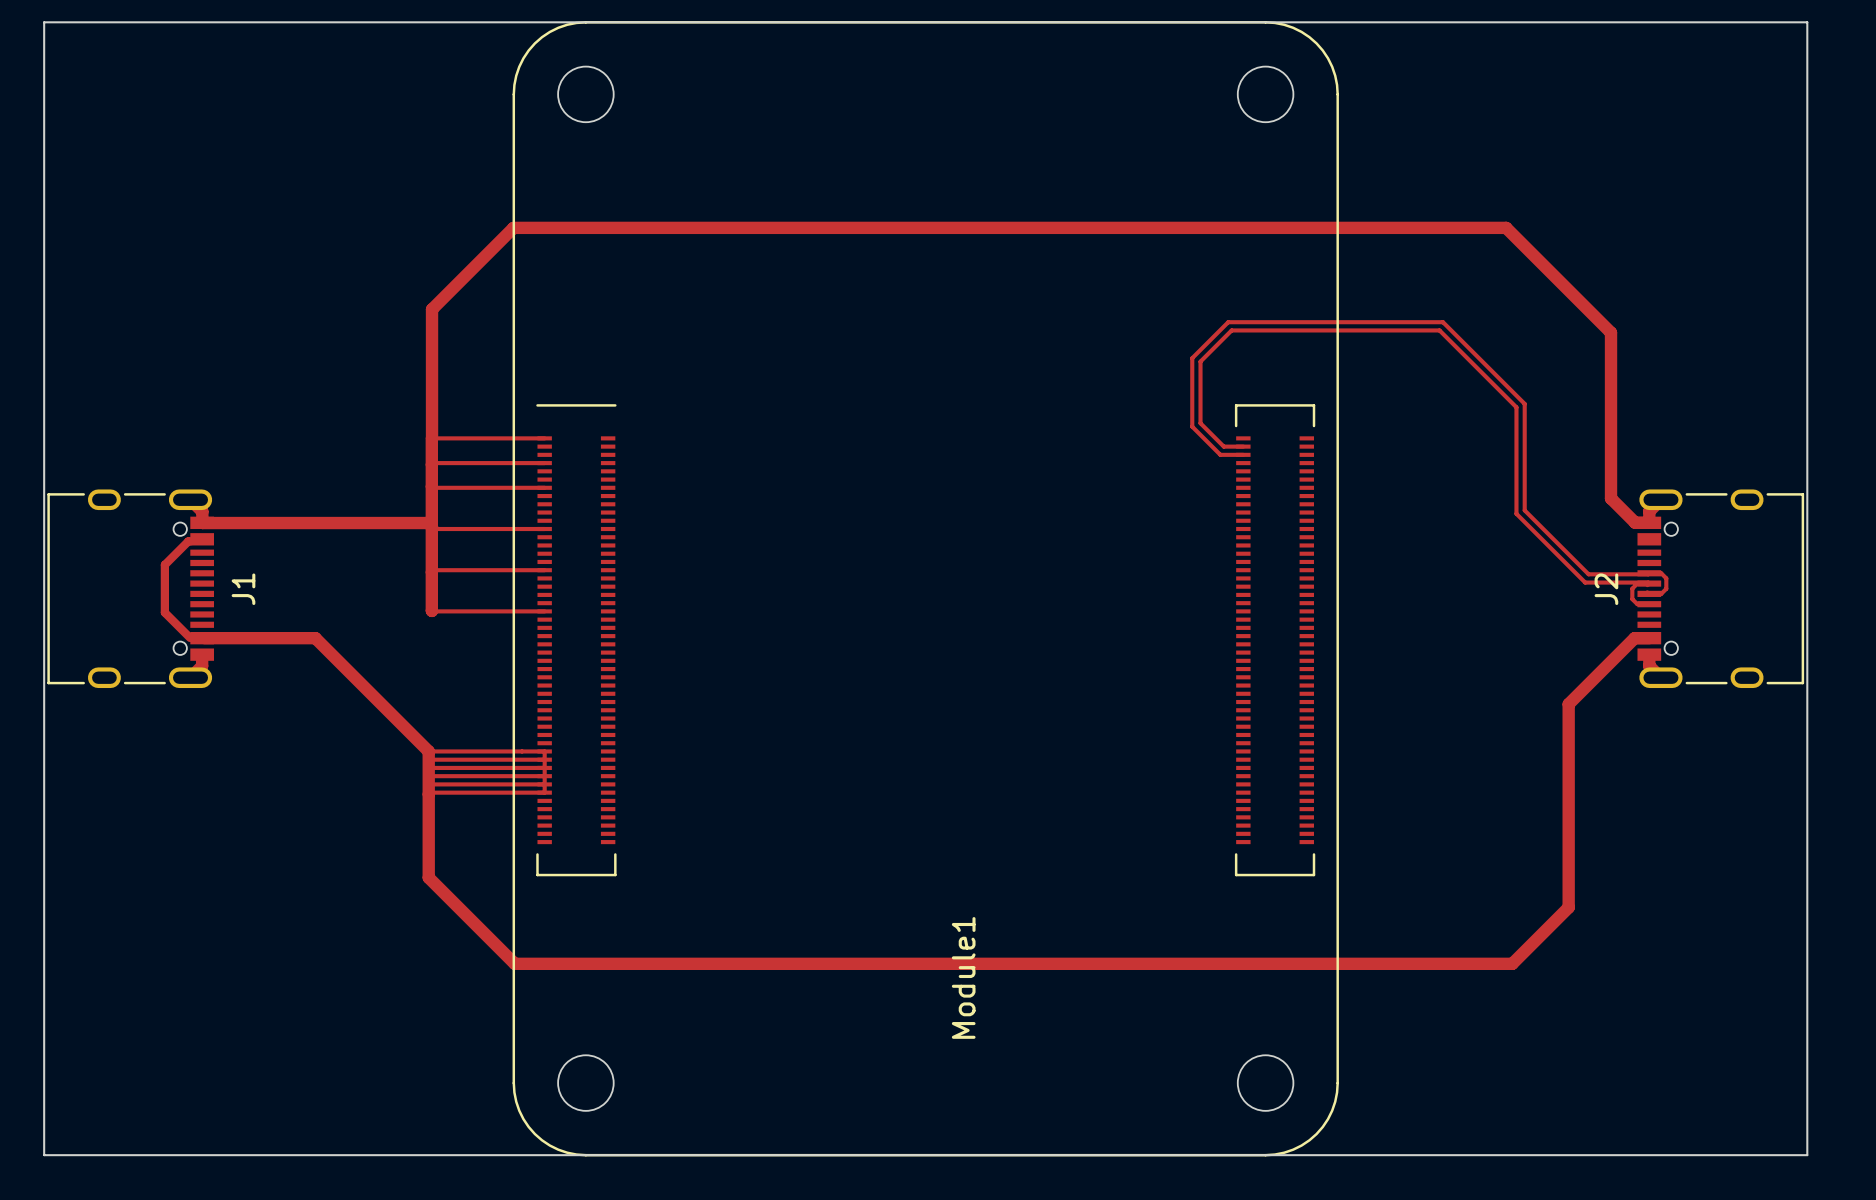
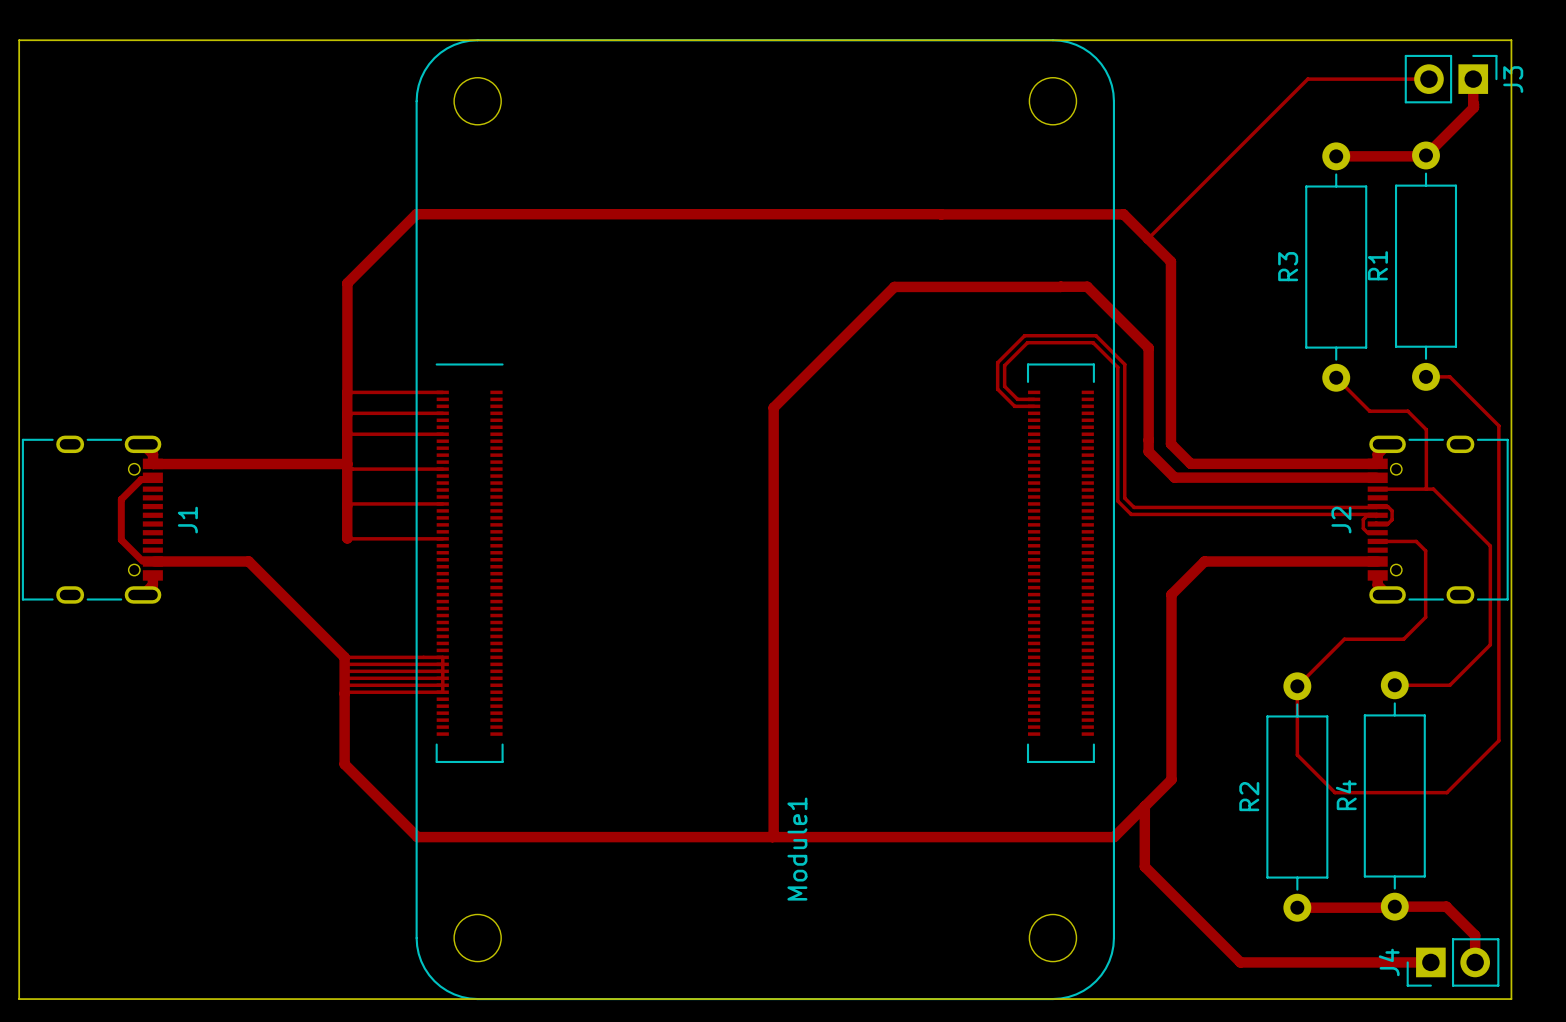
top track: none -> (1428, 79) (1307, 79) (1148, 238)
J3: none -> (1451, 79)
top track: none -> (1473, 79) (1473, 107) (1425, 156) (1336, 156)
top track: (1133, 227) (1506, 227) (1611, 332) (1611, 498) (1635, 522) -> (941, 214) (1123, 214) (1170, 261) (1170, 443) (1190, 463) (1365, 463)
R1: none -> (1426, 266)
R3: none -> (1336, 267)
top track: none -> (1060, 286) (894, 286) (773, 407) (772, 837)
top track: none -> (1060, 286) (1087, 286) (1148, 348) (1148, 451) (1174, 477) (1376, 477)
top track: none -> (1426, 376) (1449, 376) (1498, 425) (1498, 740) (1446, 792) (1335, 792) (1297, 754) (1297, 686) (1344, 639) (1403, 639) (1425, 617) (1425, 550) (1416, 541) (1377, 541)
top track: none -> (1336, 377) (1369, 411) (1407, 411) (1426, 429) (1426, 489)
top track: (1208, 431) (1200, 423) (1200, 361) (1231, 330) (1439, 330) (1516, 407) (1516, 513) (1585, 582) -> (1004, 386) (1004, 365) (1027, 342) (1093, 342) (1117, 367) (1117, 501) (1131, 514) (1323, 514)
top track: (1200, 434) (1192, 426) (1192, 358) (1228, 322) (1442, 322) (1524, 403) (1524, 510) (1588, 574) -> (997, 389) (997, 362) (1024, 335) (1096, 335) (1124, 364) (1124, 498) (1134, 507) (1326, 507)
top track: none -> (1377, 489) (1433, 489) (1490, 545) (1490, 644) (1449, 685) (1394, 685)
top track: (1634, 638) (1568, 704) (1568, 907) (1512, 963) (1337, 963) -> (1365, 561) (1204, 561) (1171, 594) (1171, 779) (1114, 837)
R4: none -> (1394, 795)
R2: none -> (1297, 797)
top track: none -> (1144, 806) (1144, 866) (1240, 962) (1430, 962)
top track: none -> (1297, 907) (1446, 906) (1475, 935) (1475, 962)
J4: none -> (1453, 962)

